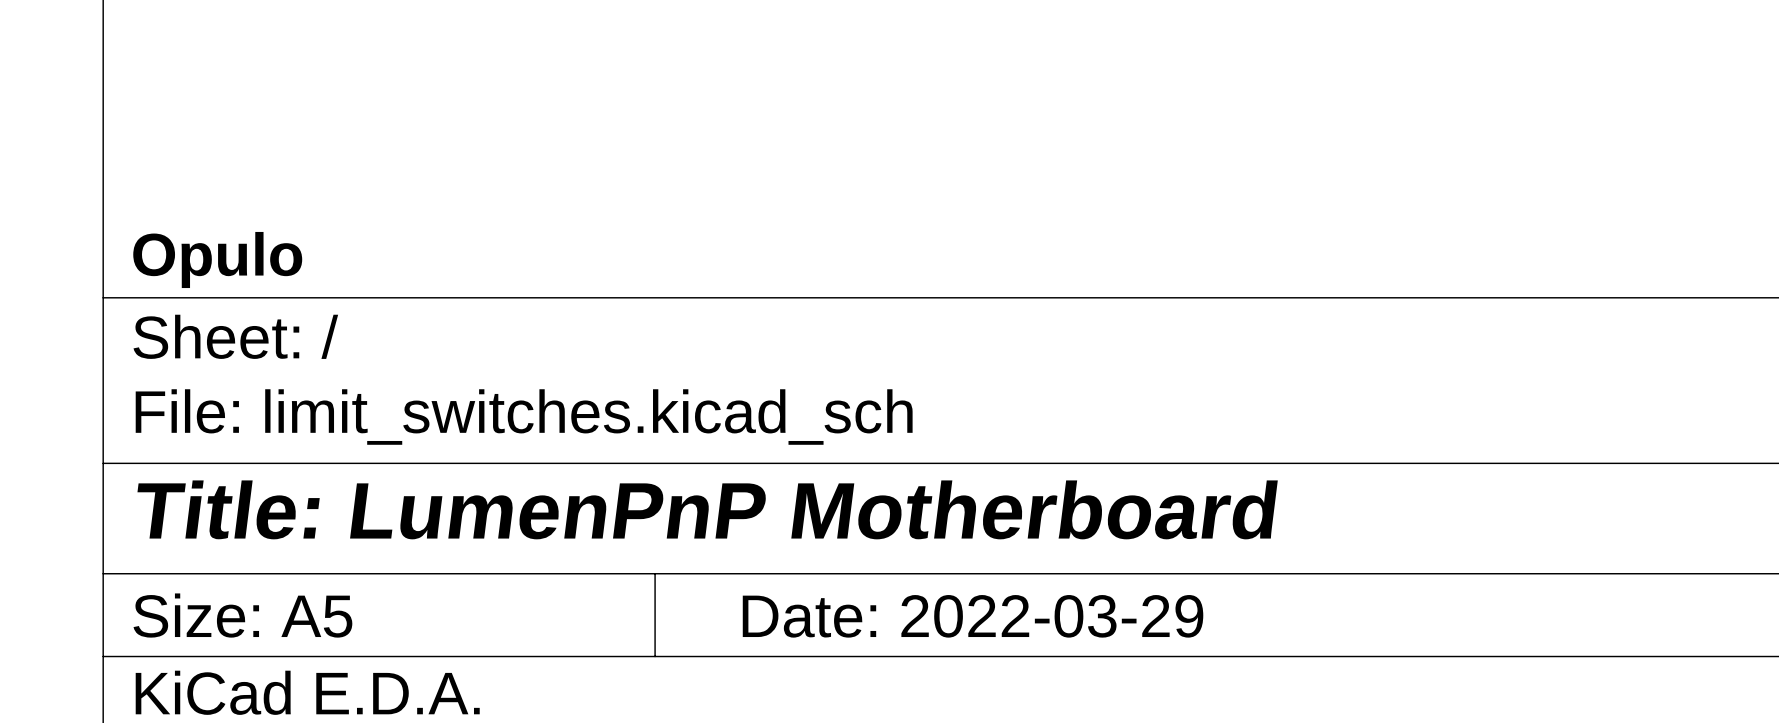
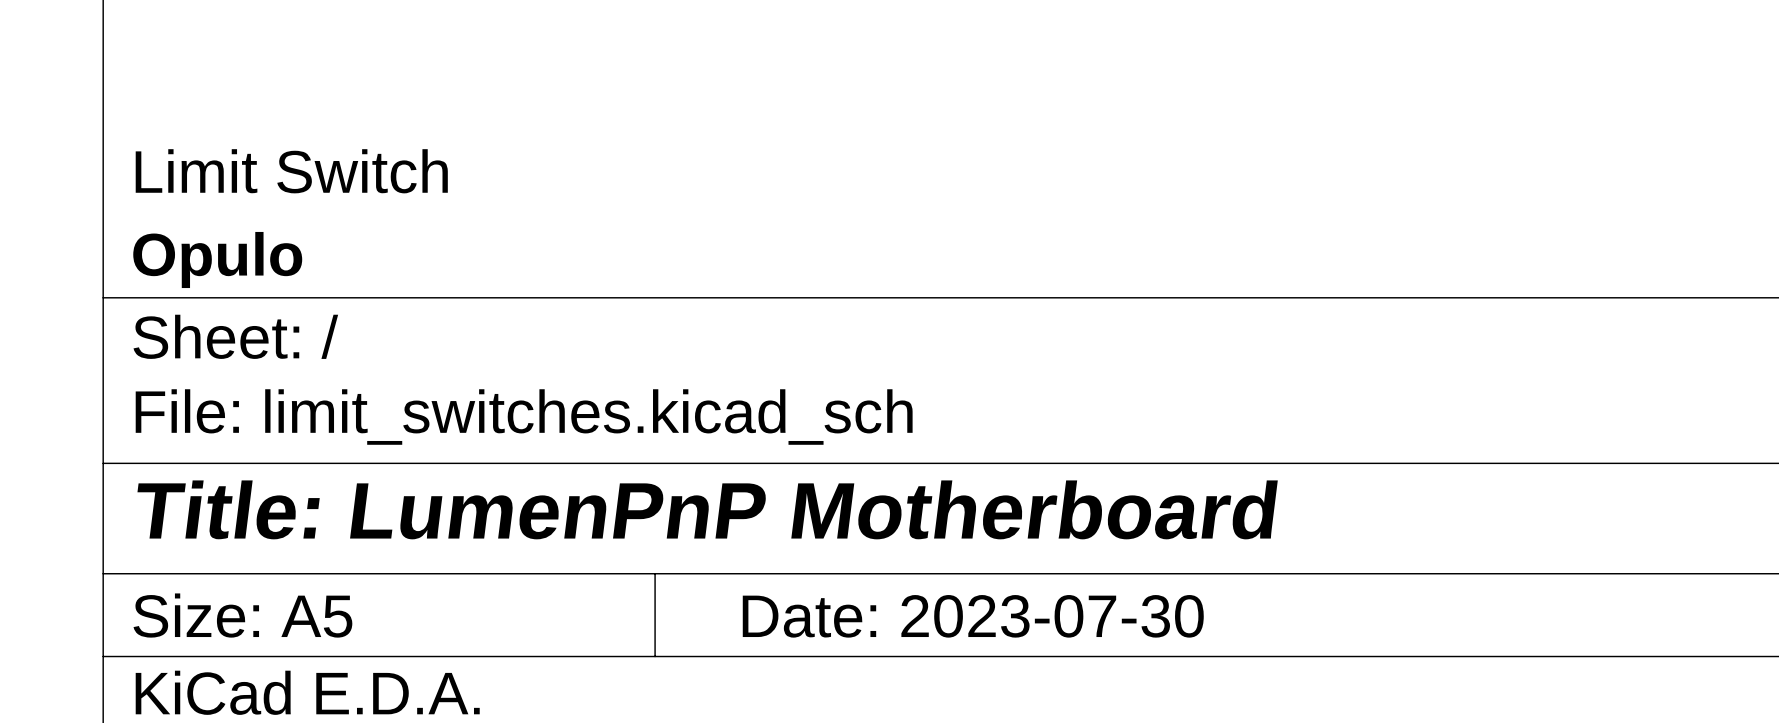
title block: none -> Limit Switch (291, 171)
title block: Date: 2022-03-29 (973, 616) -> Date: 2023-07-30 (973, 616)

